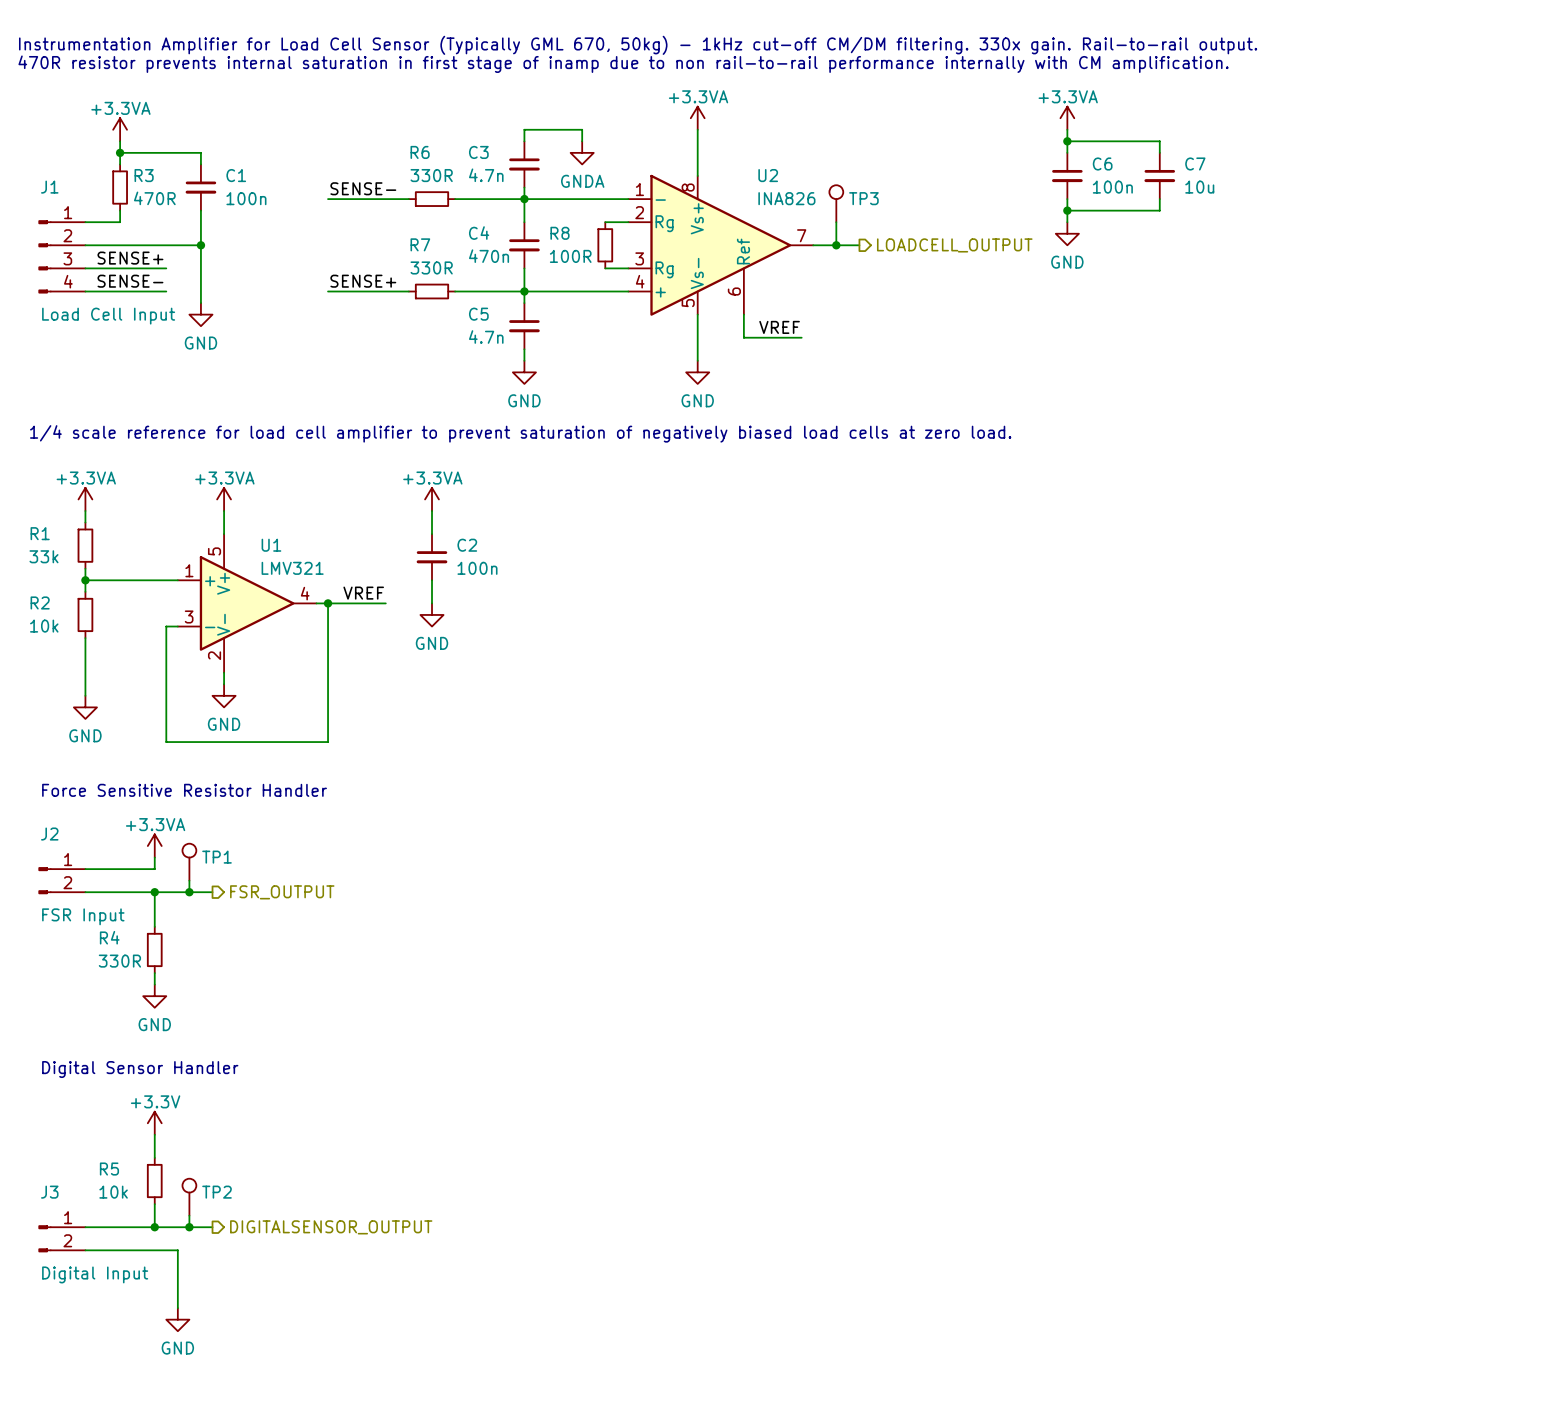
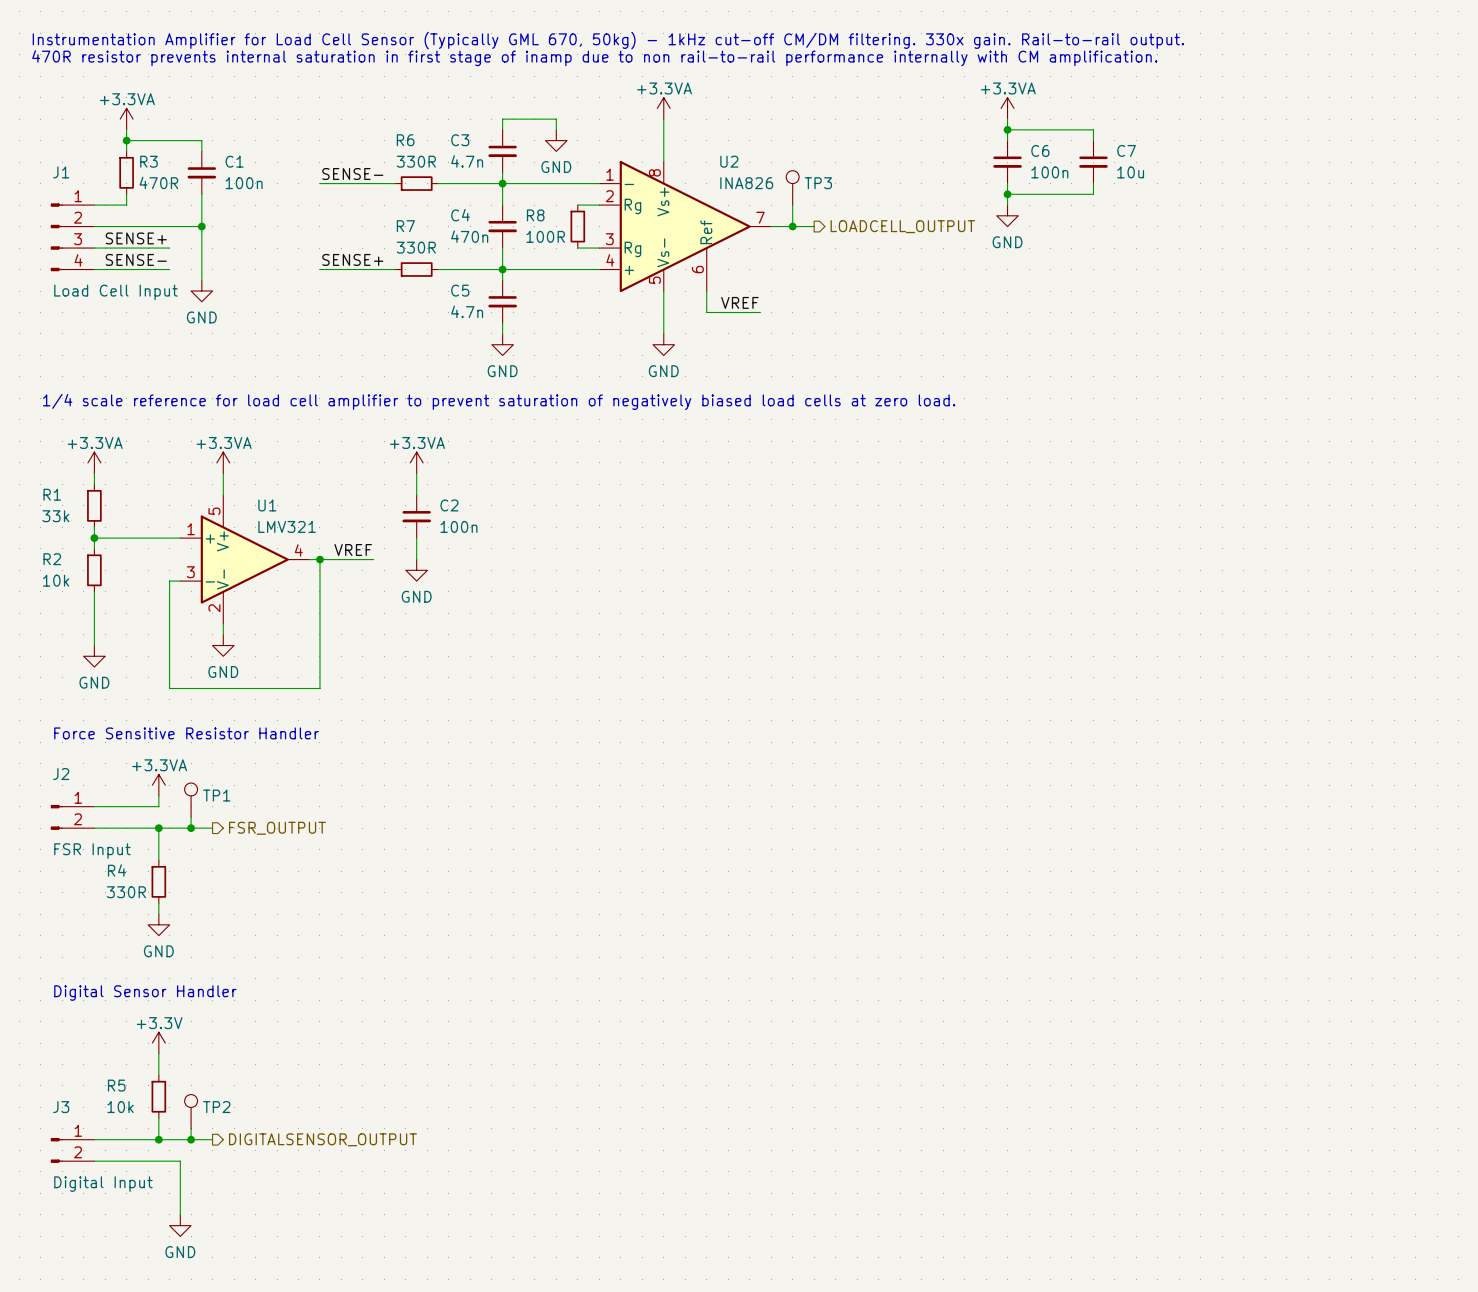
power symbol: GNDA (582, 152) -> GND (556, 140)

